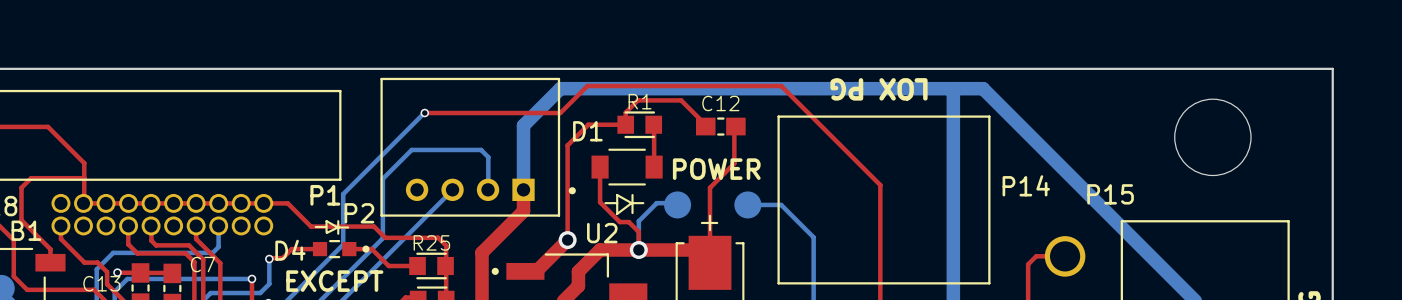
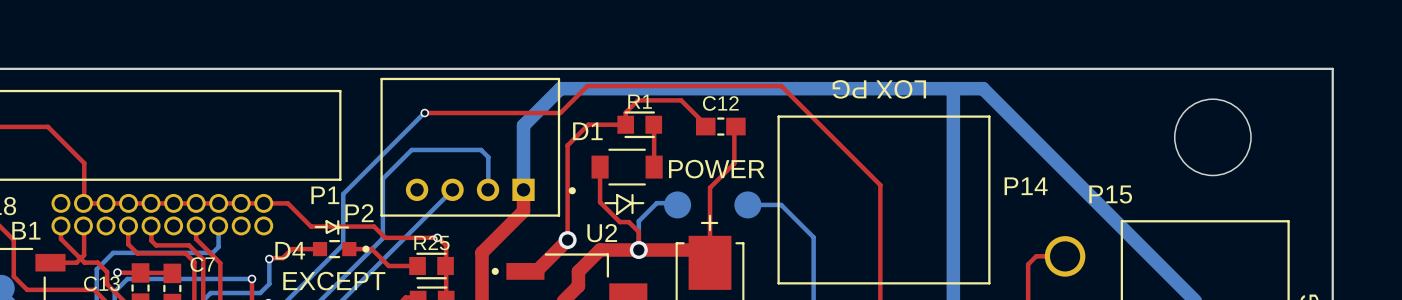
top track: (84, 178) (31, 178) (21, 187) (21, 220) (50, 249) (50, 262) -> (84, 232) (84, 255) (76, 262) (50, 262)
via: none -> (437, 237)

